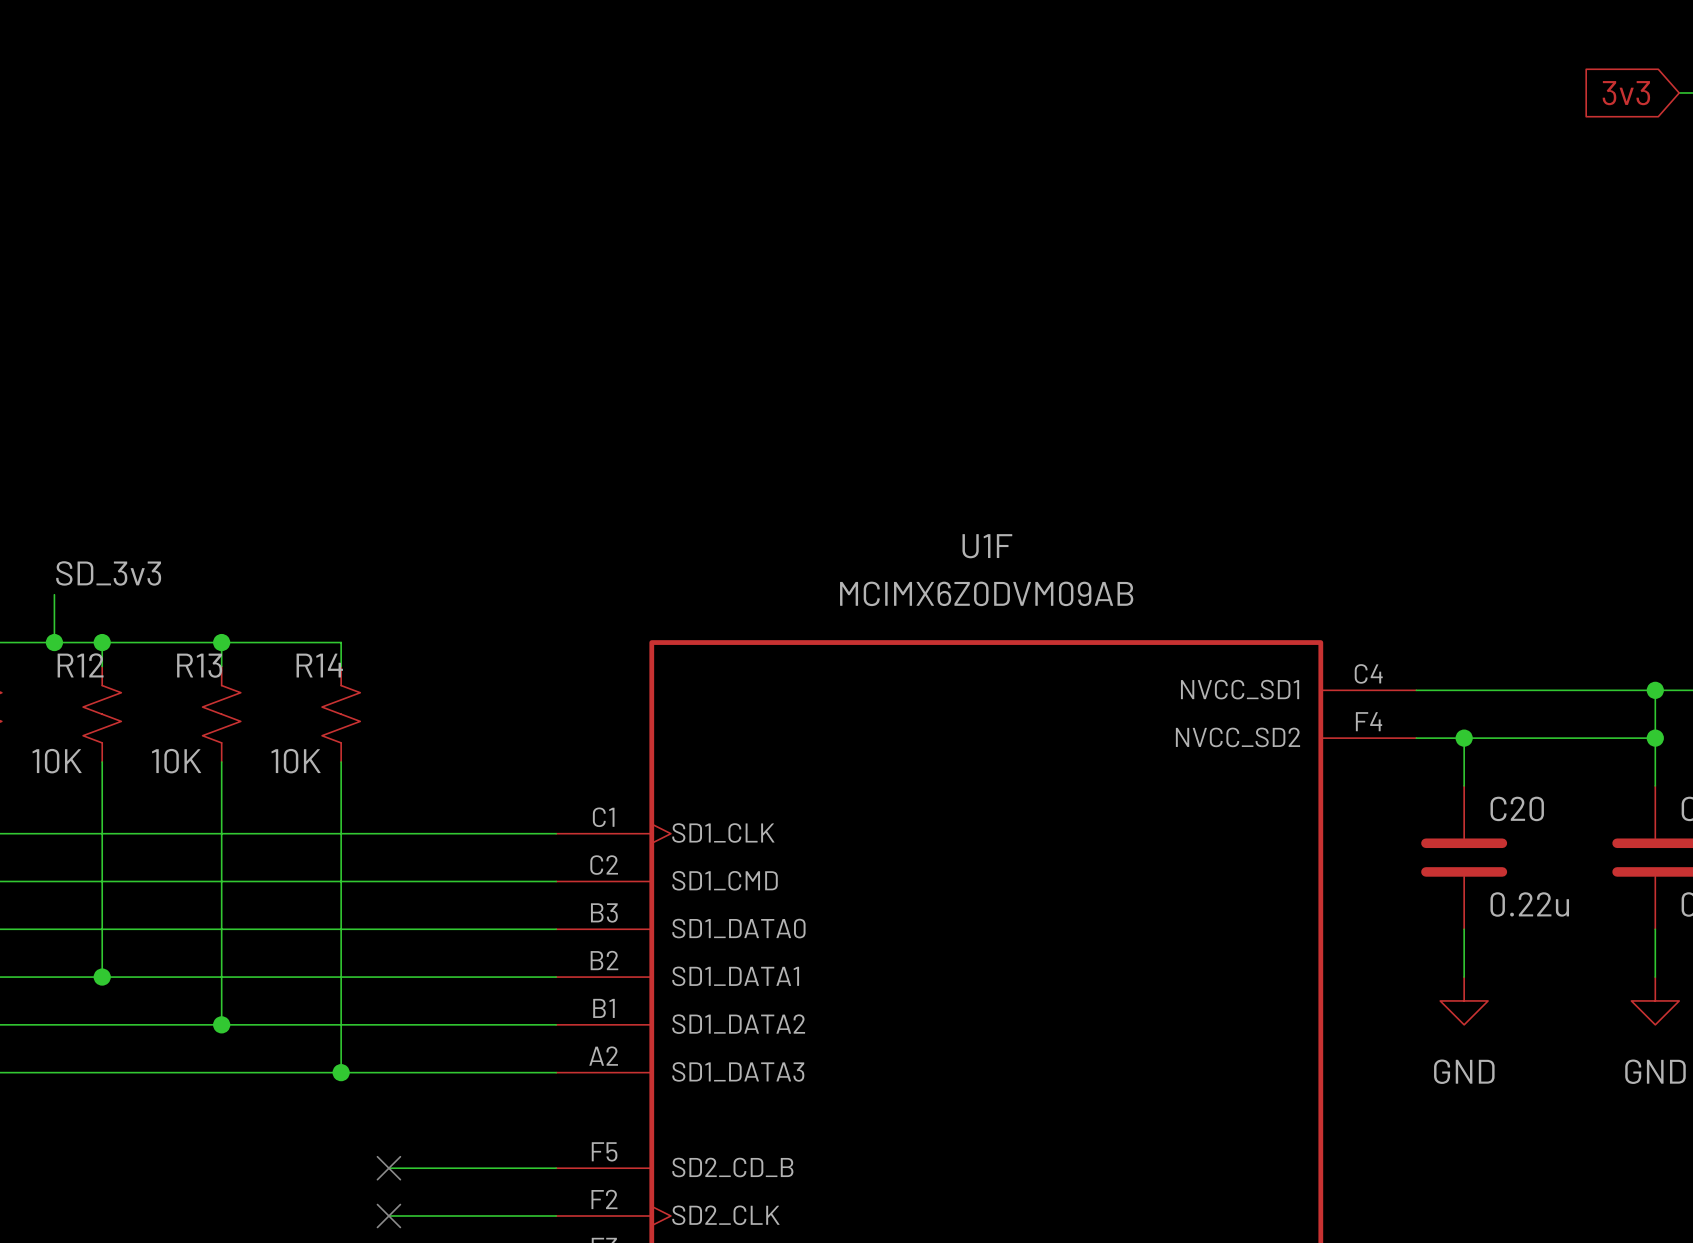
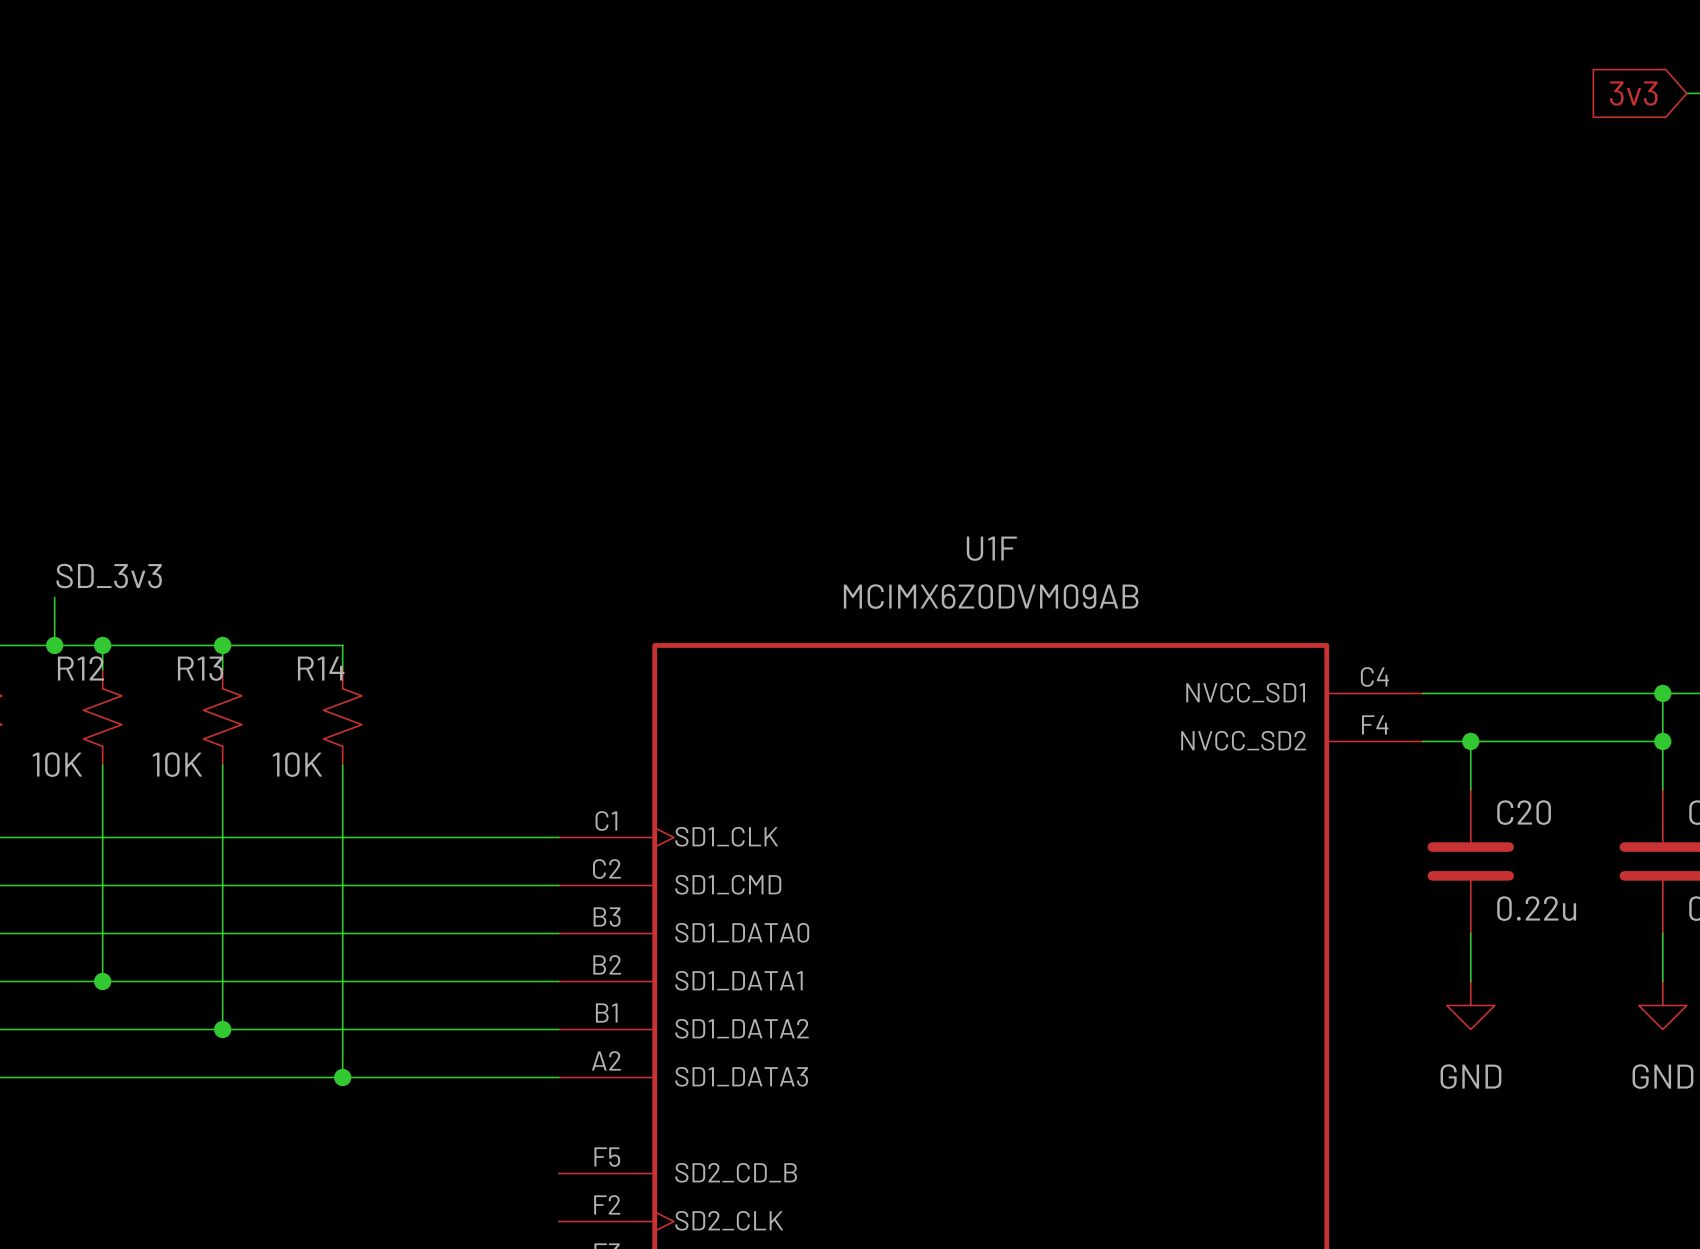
wire: (388, 1168) (556, 1168) -> none
no-connect mark: (388, 1168) -> none
wire: (388, 1216) (556, 1216) -> none
no-connect mark: (388, 1216) -> none

